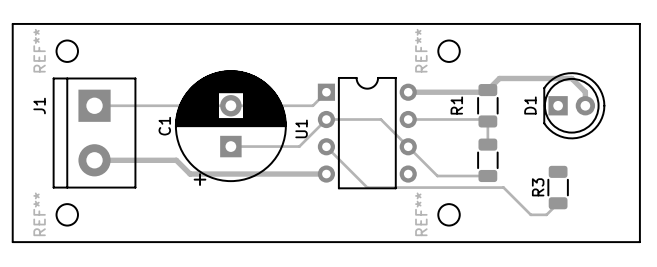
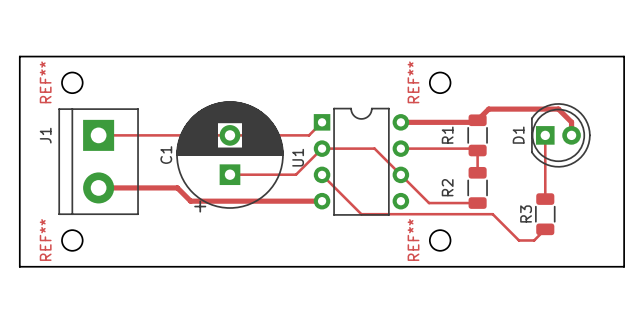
track: none -> (545, 135) (545, 199)
R2 name: none -> R2 (447, 187)

